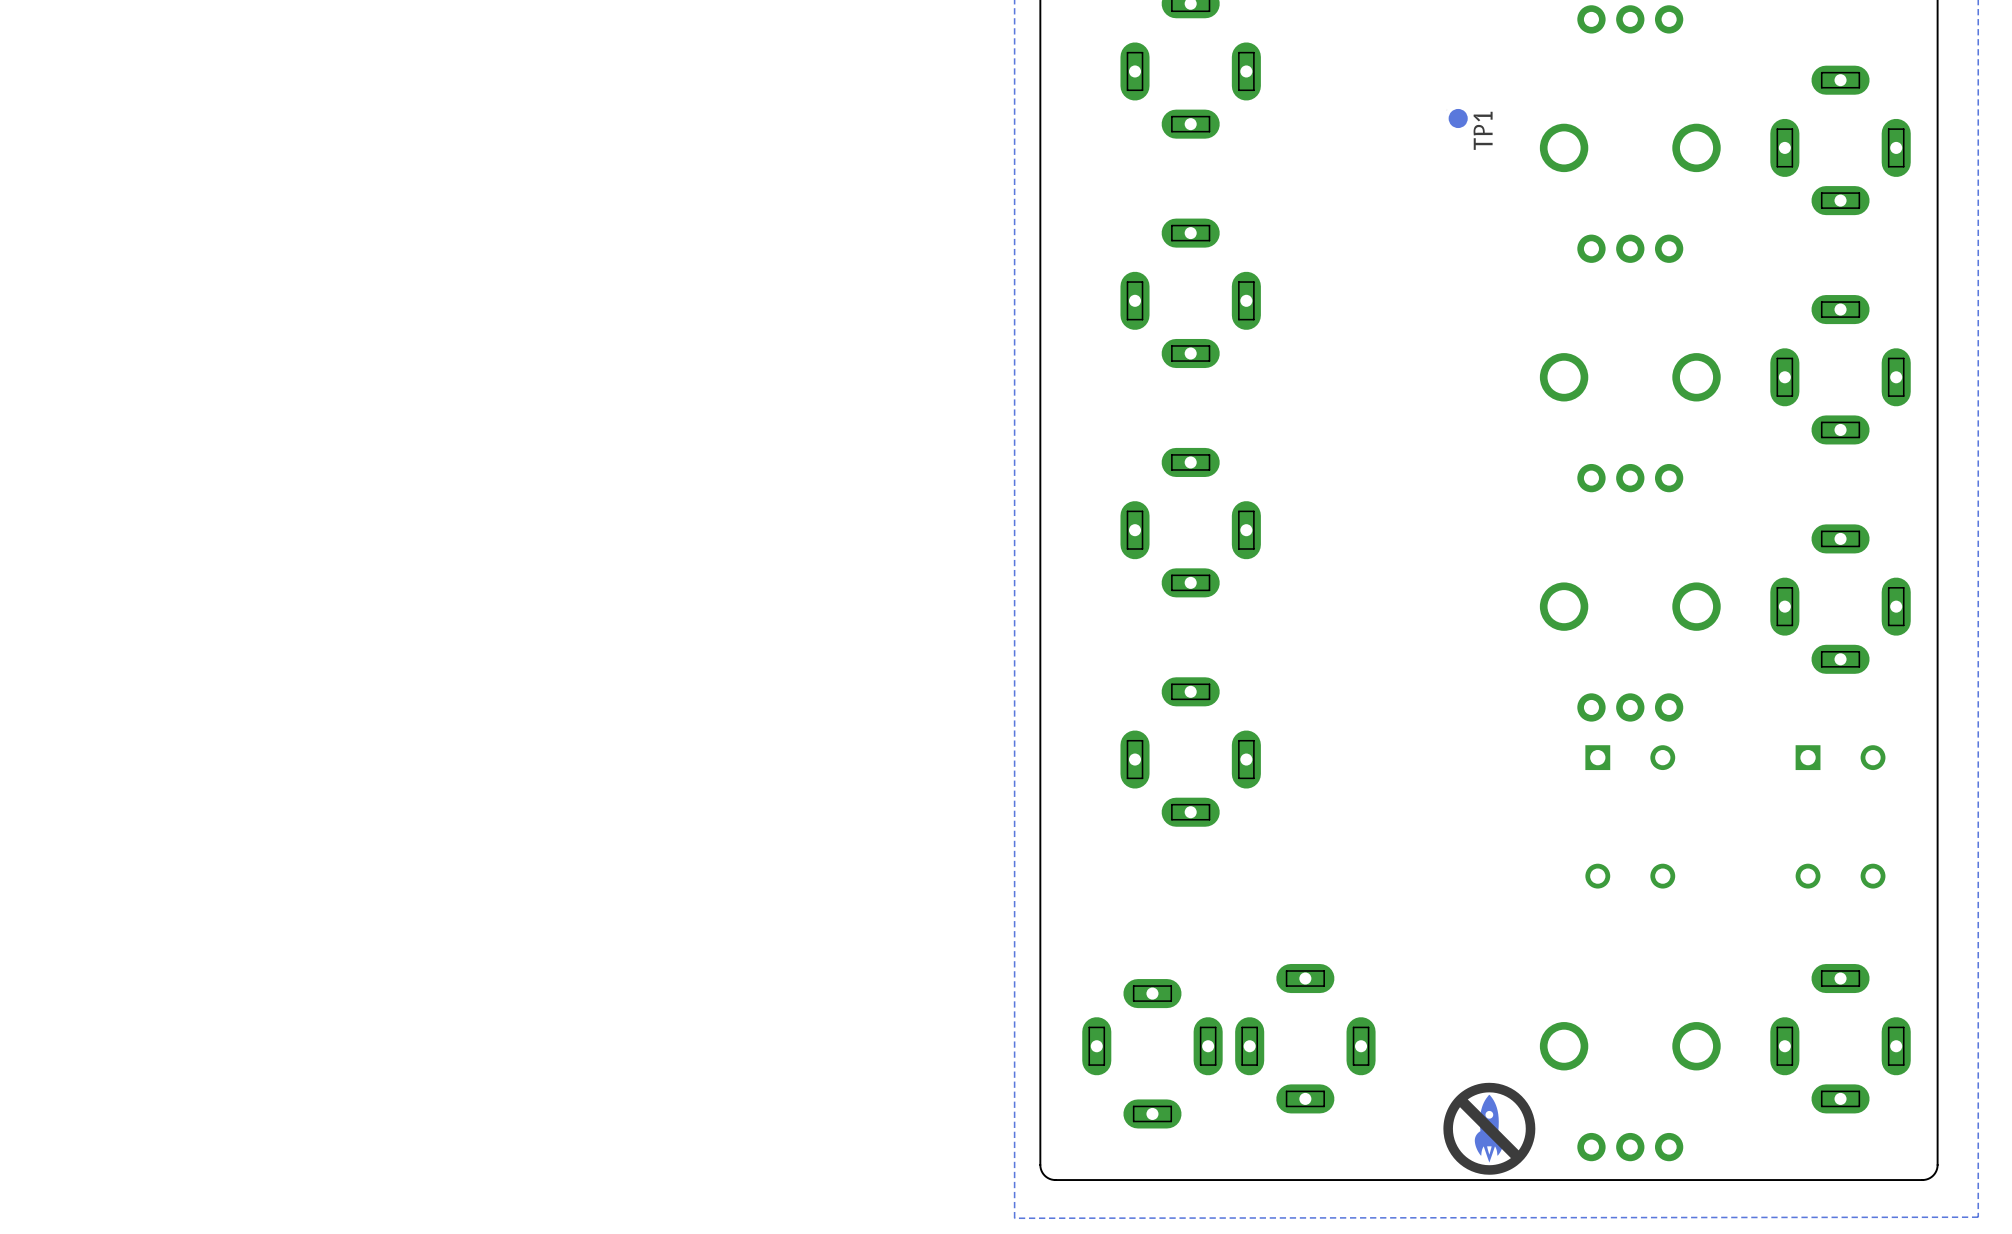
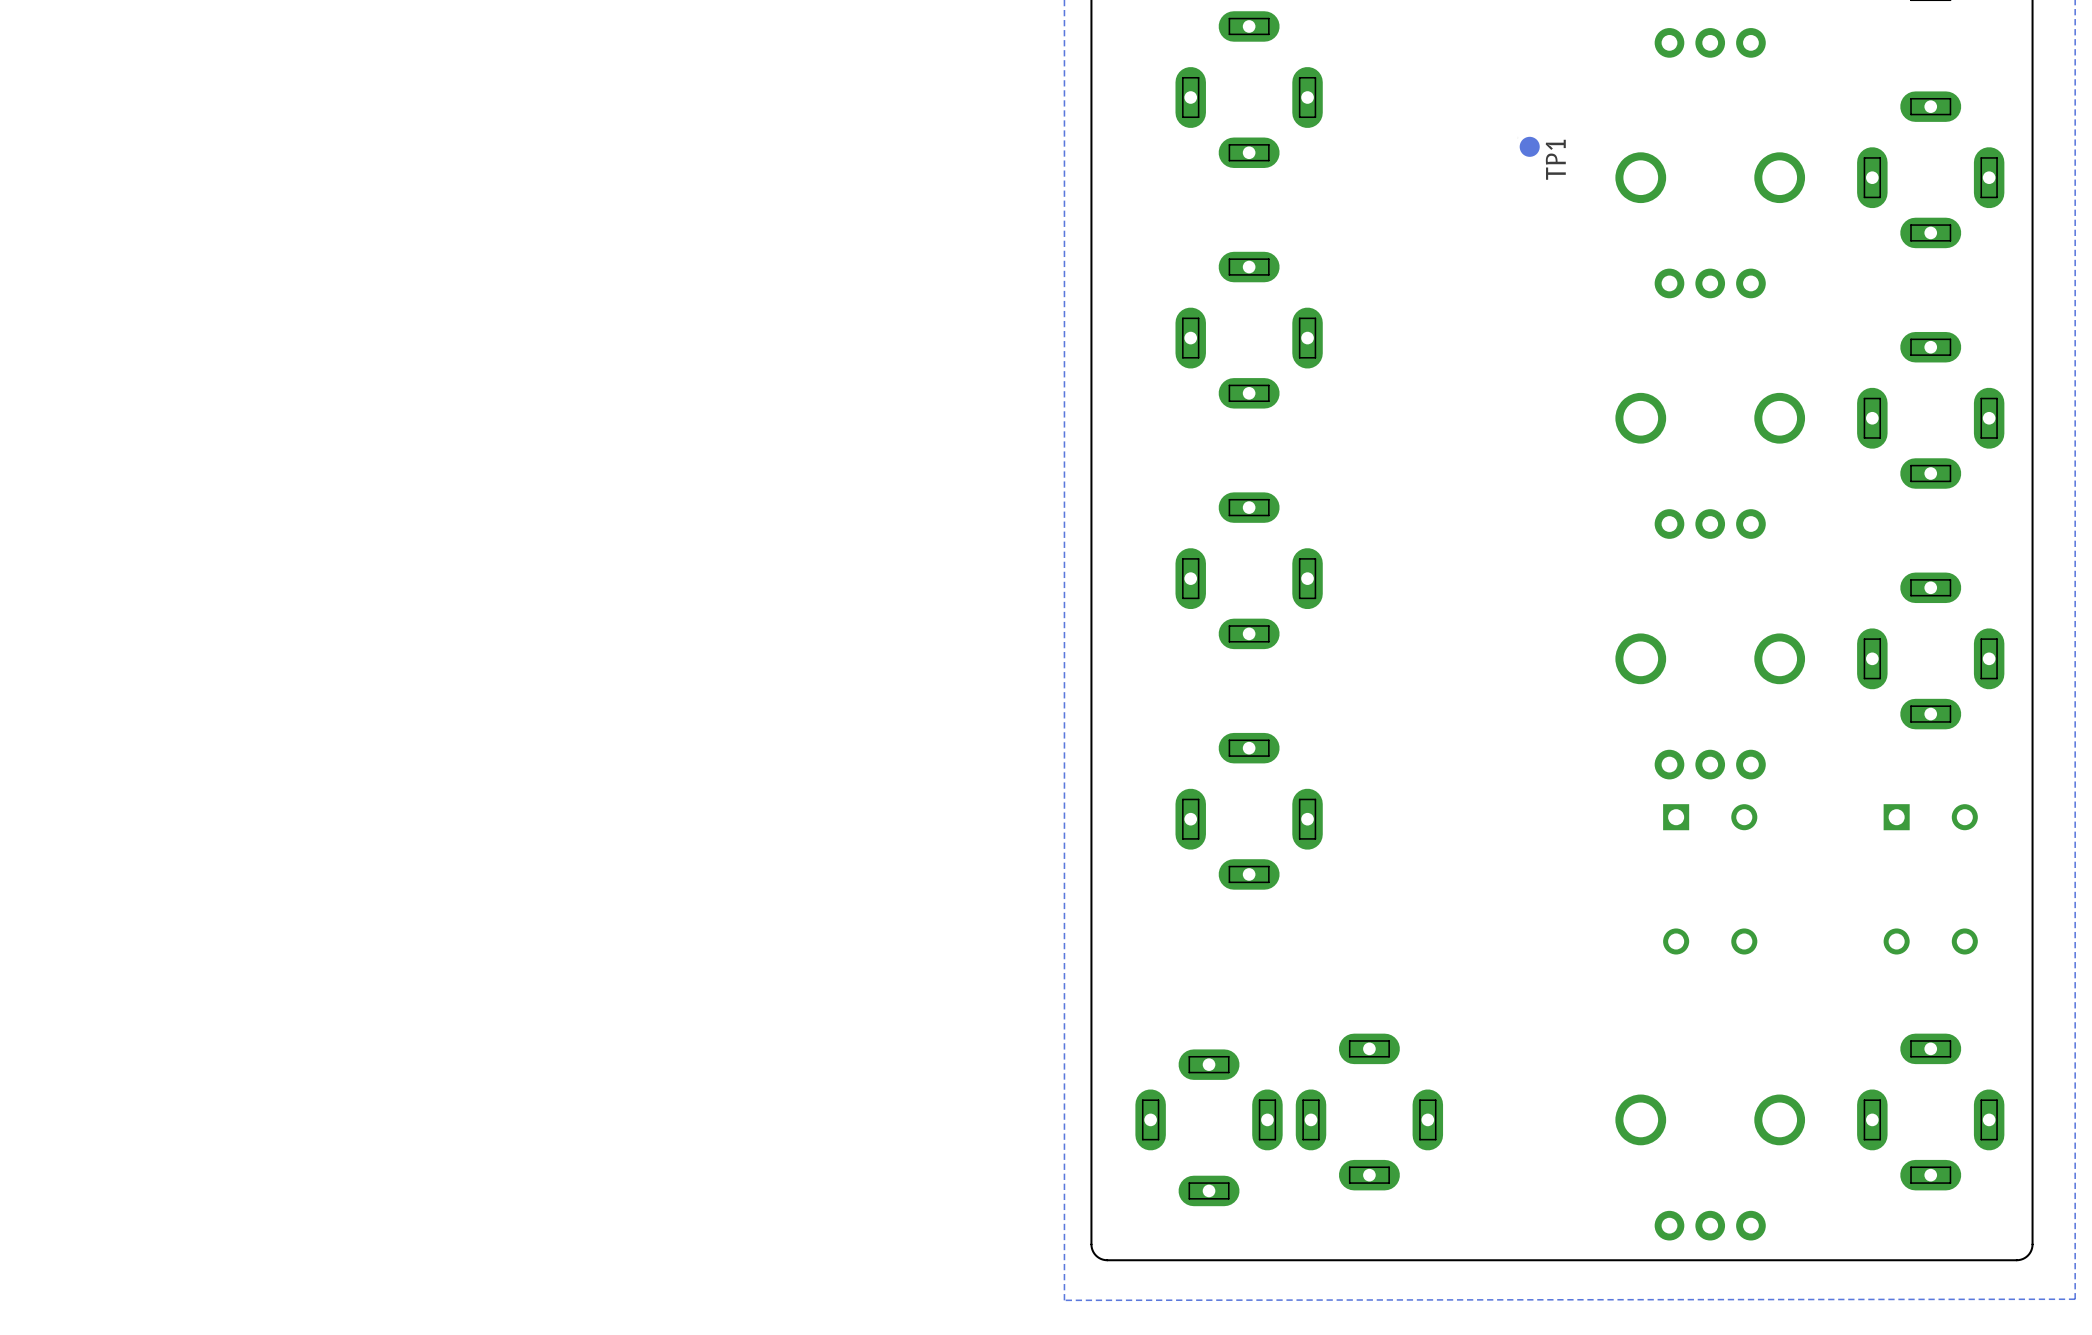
drawing: [1443, 1082, 1536, 1175] -> none

